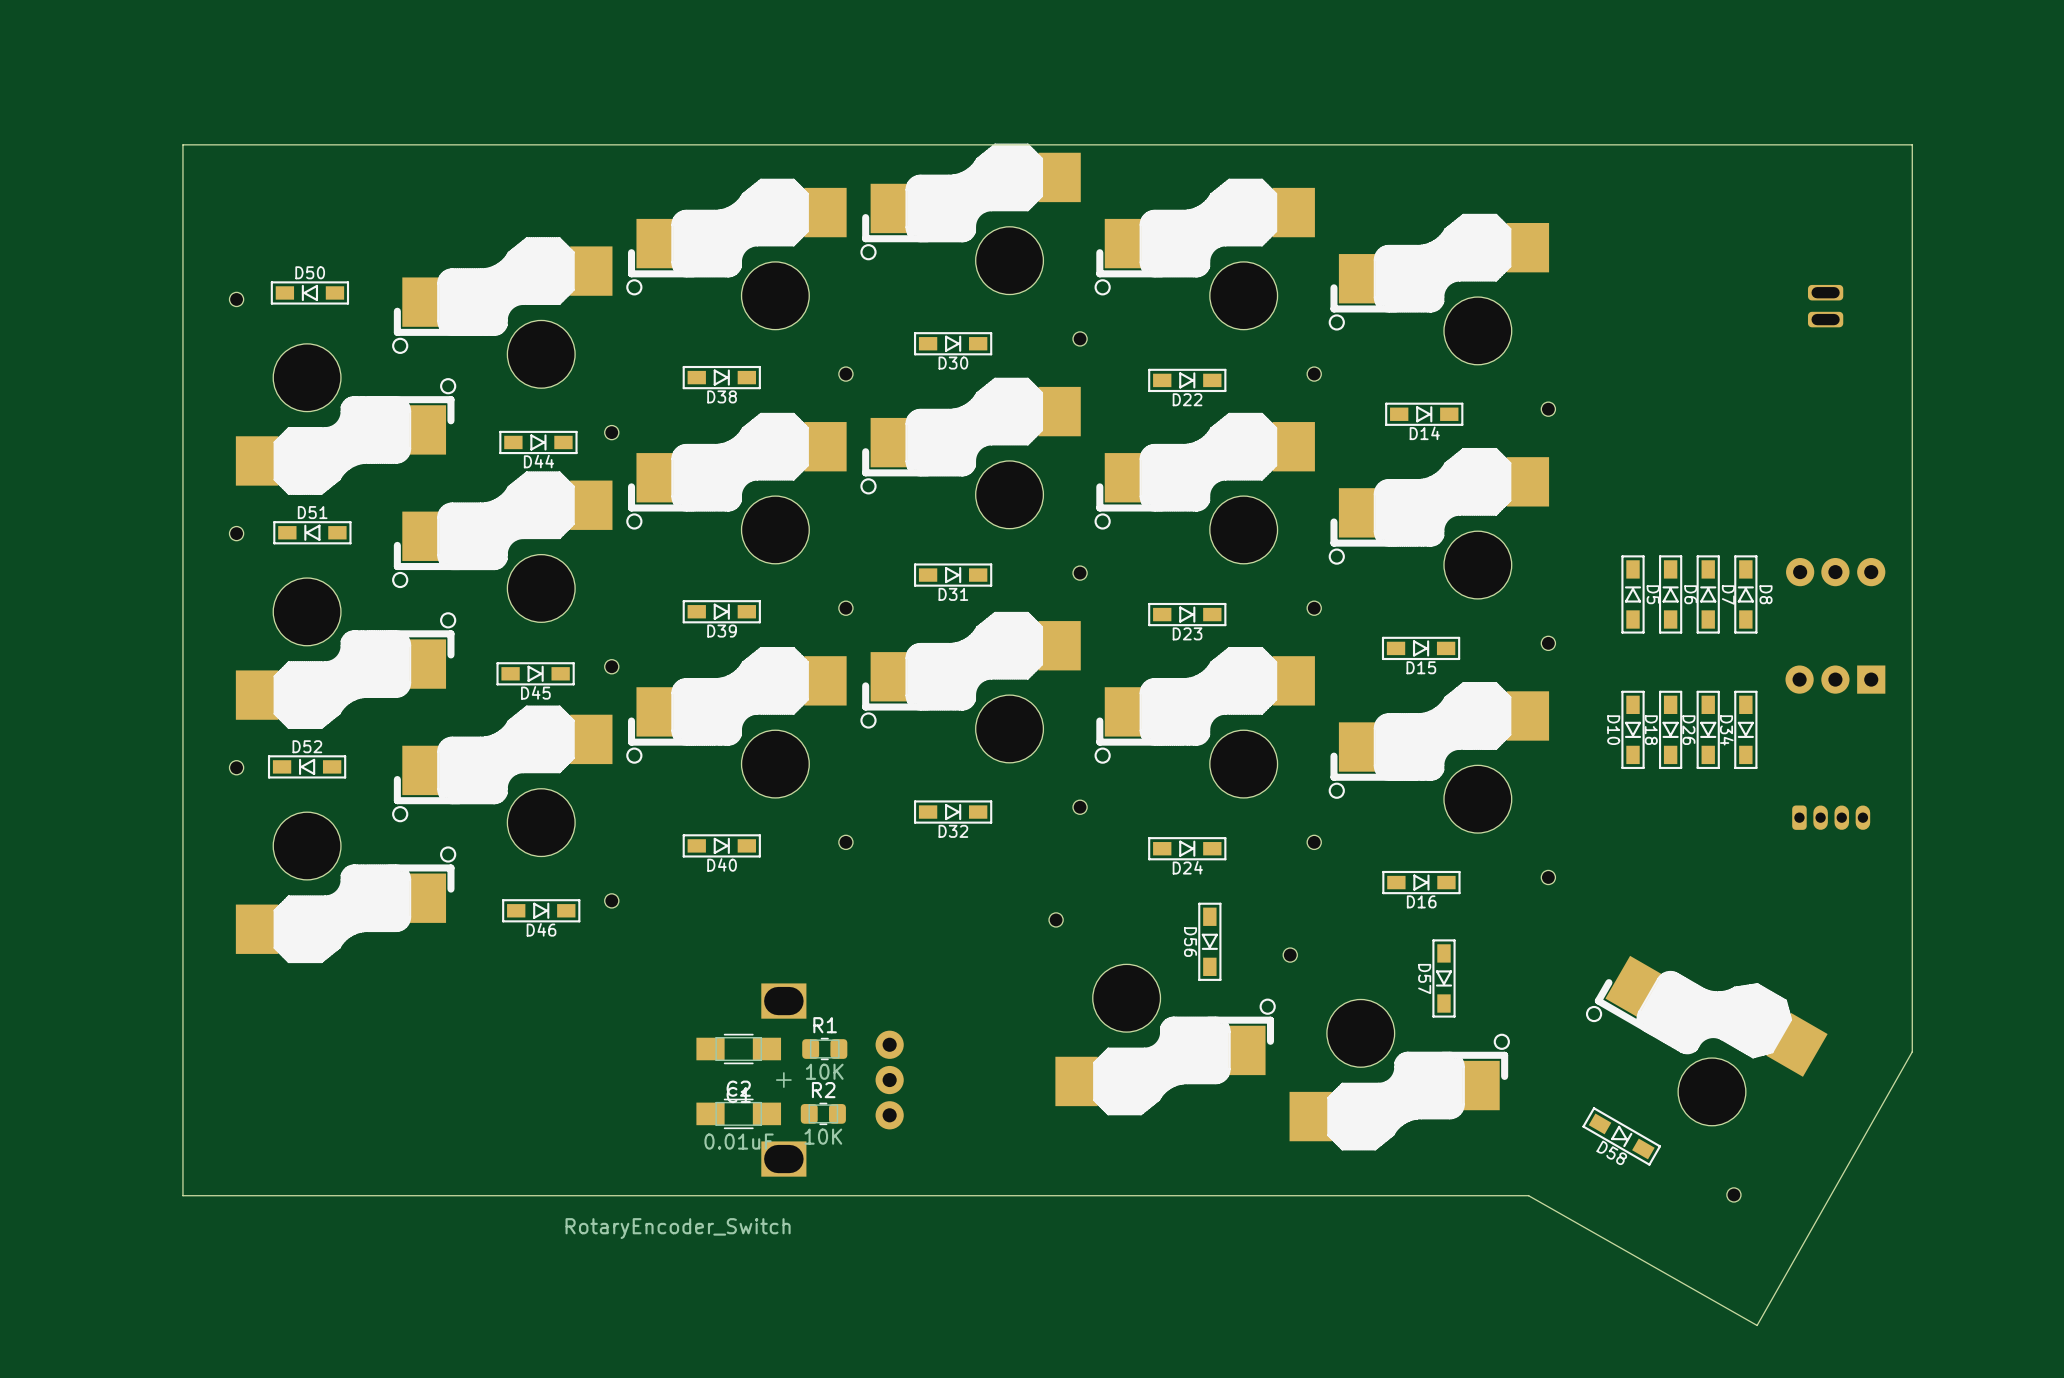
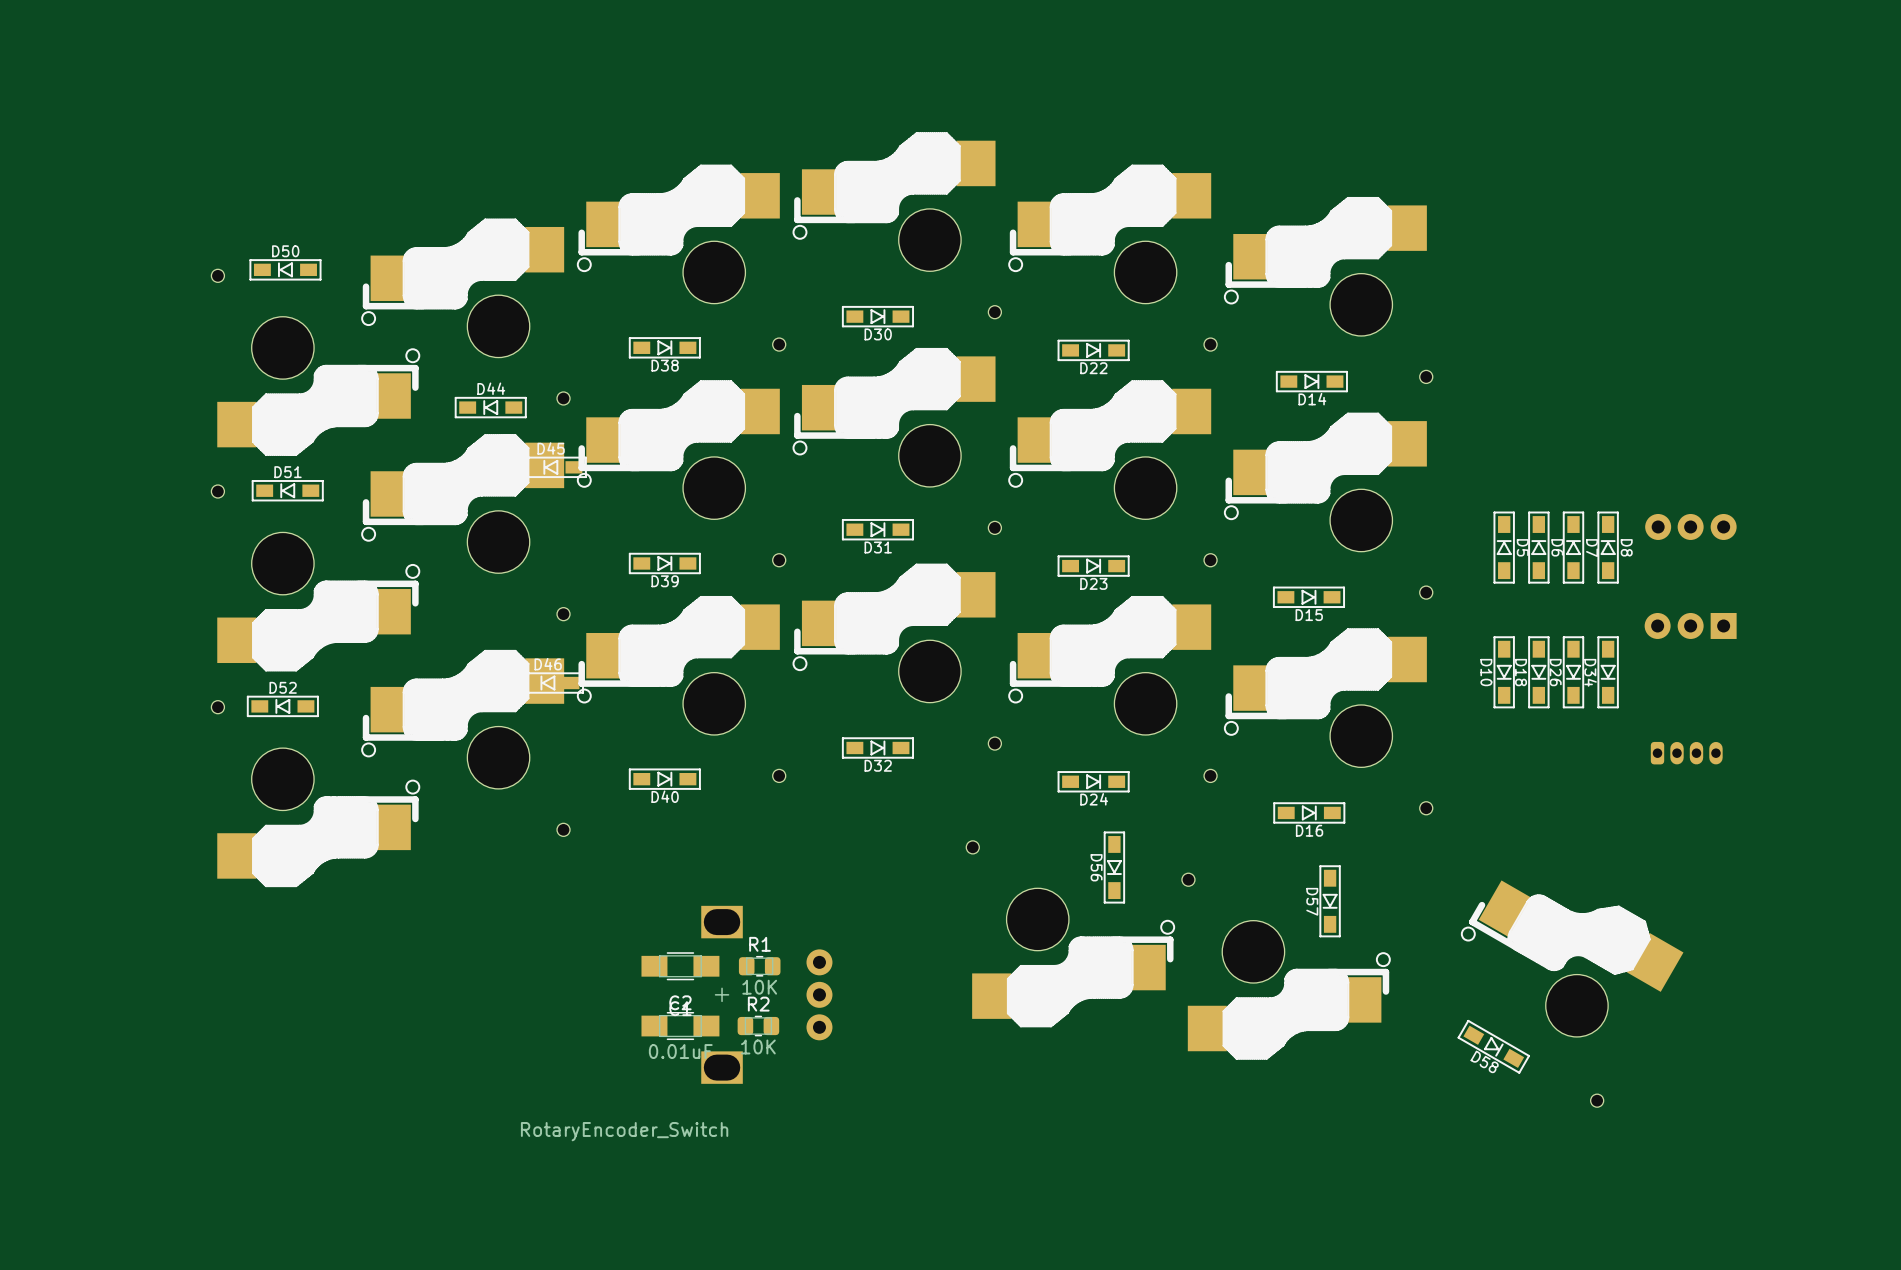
board edge: (1912, 144) (182, 144) (182, 1195) (1528, 1195) (1757, 1325) (1912, 1051) (1912, 144) -> none
part: (1825, 306) -> none
D44 rotation: 0° (538, 442) -> 180° (490, 407)
D45 rotation: 0° (535, 673) -> 180° (550, 467)
D45 position: (535, 673) -> (550, 467)
D46 rotation: 0° (541, 910) -> 180° (547, 683)
D46 position: (541, 910) -> (547, 683)

